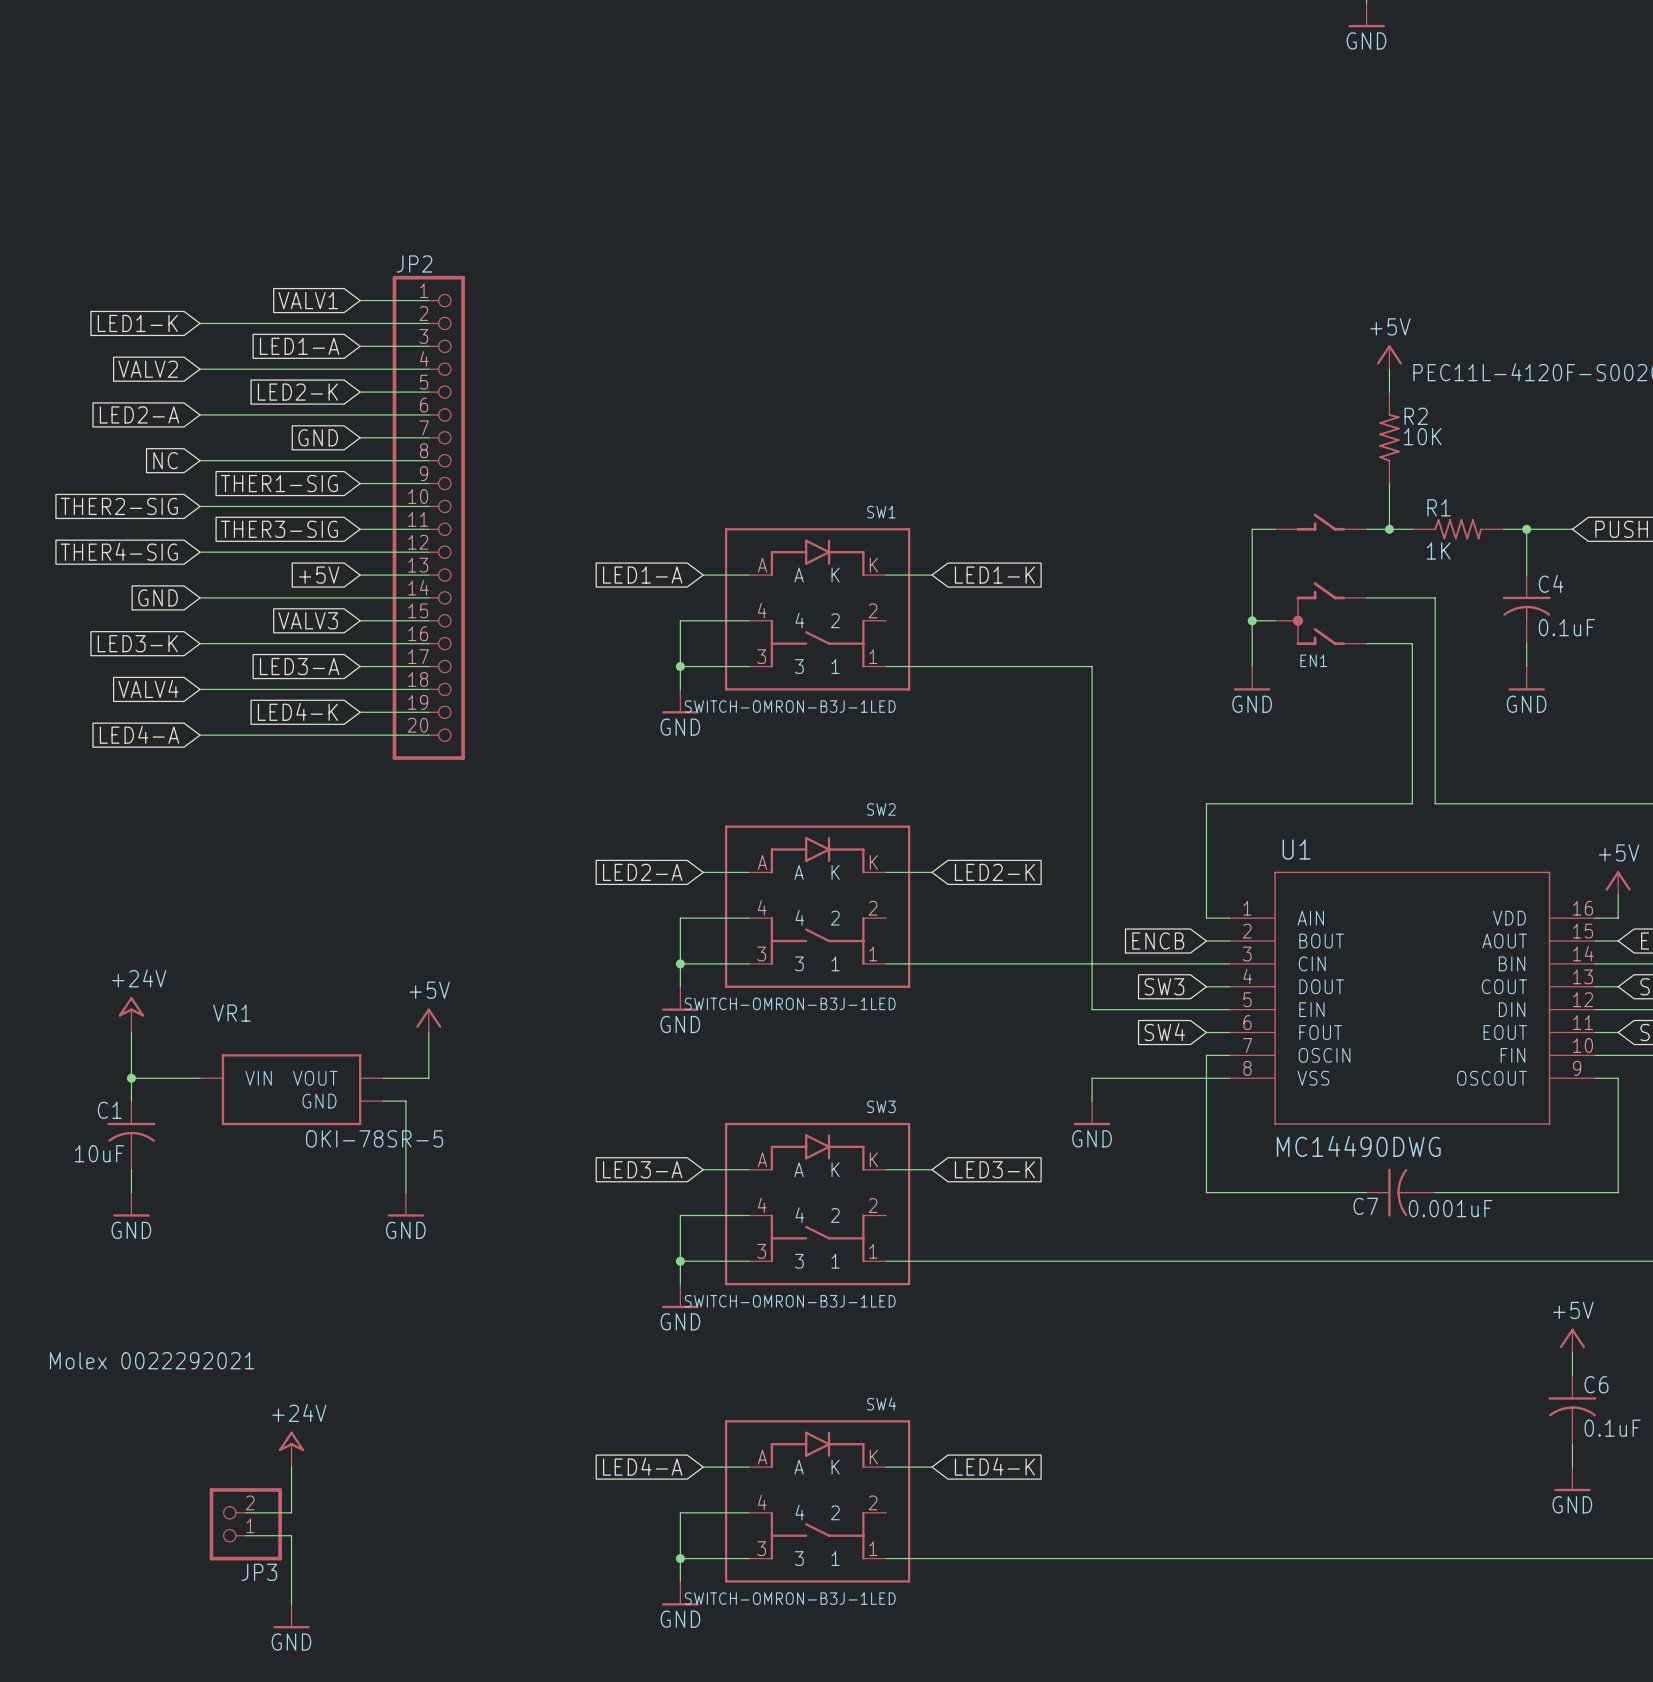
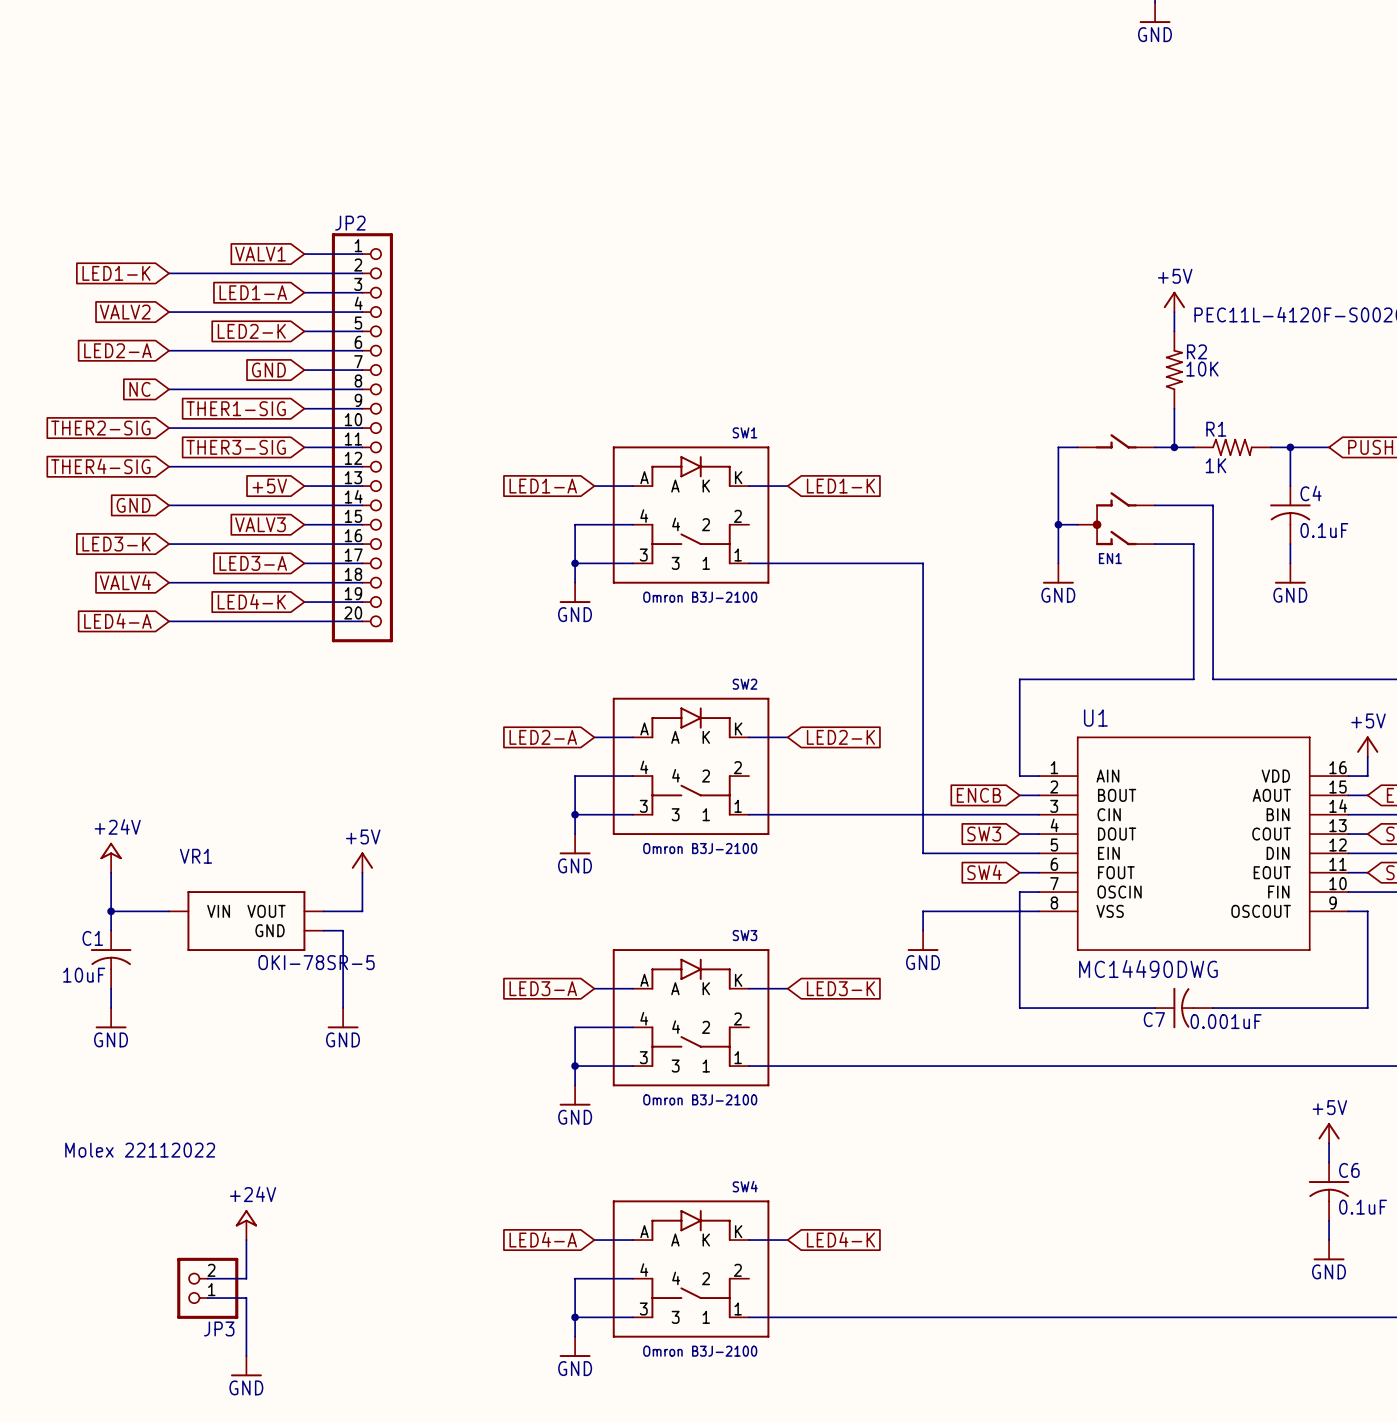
SW1 value: SWITCH-OMRON-B3J-1LED (790, 706) -> Omron B3J-2100 (700, 597)
SW2 value: SWITCH-OMRON-B3J-1LED (790, 1003) -> Omron B3J-2100 (700, 848)
SW3 value: SWITCH-OMRON-B3J-1LED (790, 1301) -> Omron B3J-2100 (700, 1099)
JP3 value: Molex 0022292021 (152, 1360) -> Molex 22112022 (140, 1150)
SW4 value: SWITCH-OMRON-B3J-1LED (790, 1598) -> Omron B3J-2100 (700, 1351)

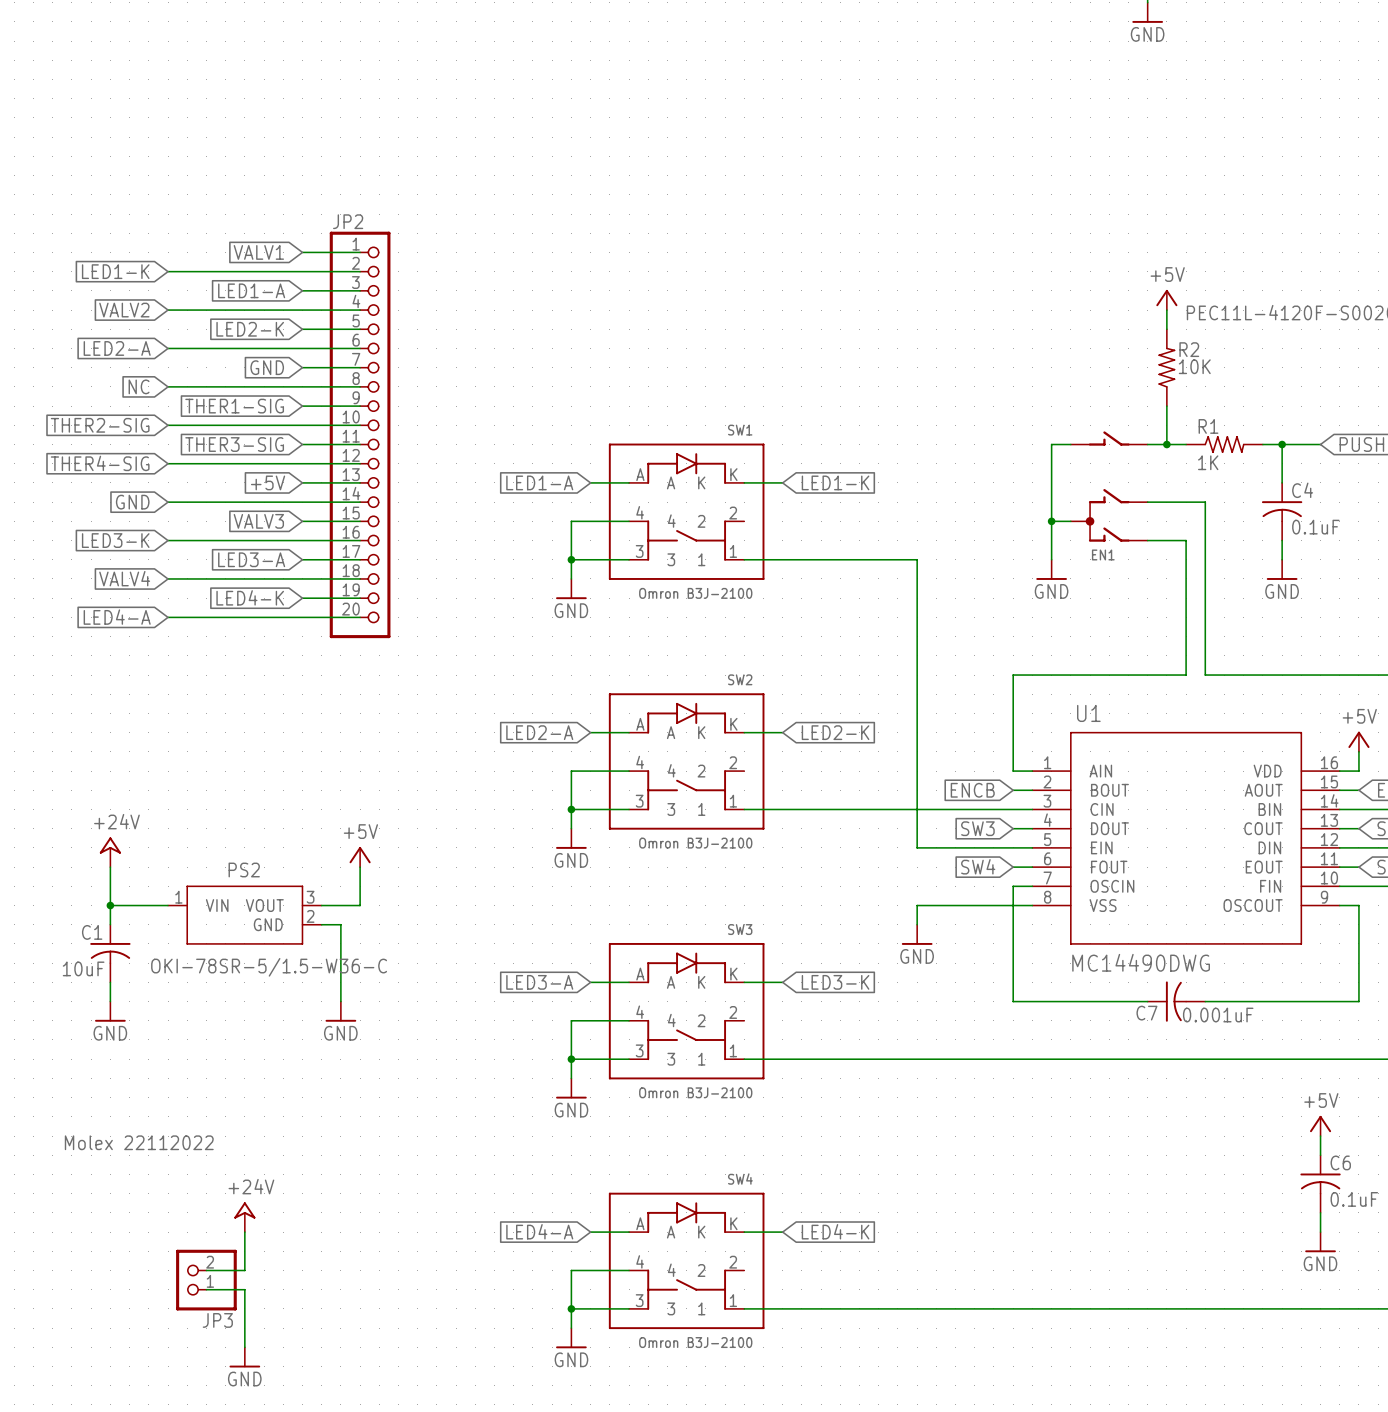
VR1: OKI-78SR-5 (246, 921) -> none
PS2: none -> OKI-78SR-5/1.5-W36-C (244, 915)

